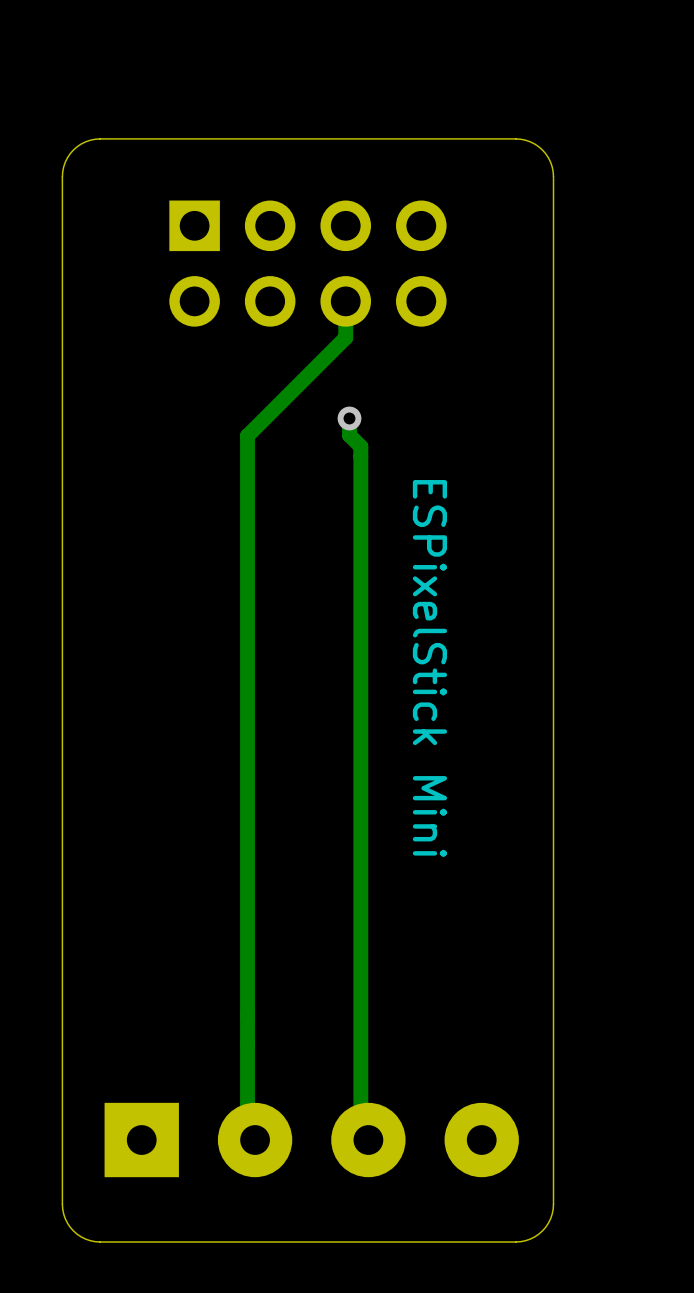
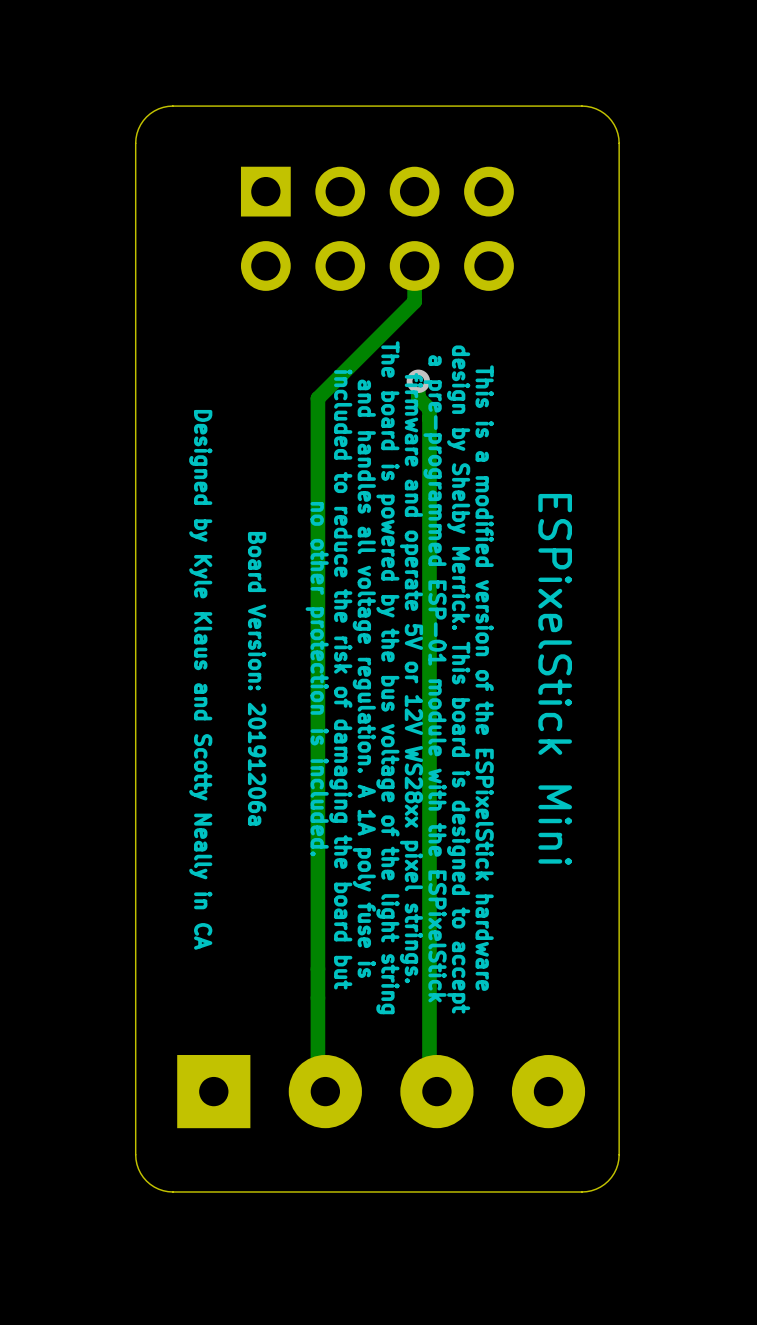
text position: ESPixelStick Mini (429, 668) -> ESPixelStick Mini (555, 679)
text: none -> The board is powered by the bus voltage of the light string (387, 677)
text: none -> firmware and operate 5V or 12V WS28xx pixel strings. (411, 678)
text: none -> This is a modified version of the ESPixelStick hardware (484, 678)
text: none -> Board Version: 20191206a (257, 678)
text: none -> and handles all voltage regulation. A 1A poly fuse is (364, 678)
text: none -> a pre-programmed ESP-01 module with the ESPixelStick (435, 678)
text: none -> Designed by Kyle Klaus and Scotty Neally in CA (200, 679)
text: none -> no other protection is included. (317, 679)
text: none -> included to reduce the risk of damaging the board but (340, 679)
text: none -> design by Shelby Merrick. This board is designed to accept (458, 679)

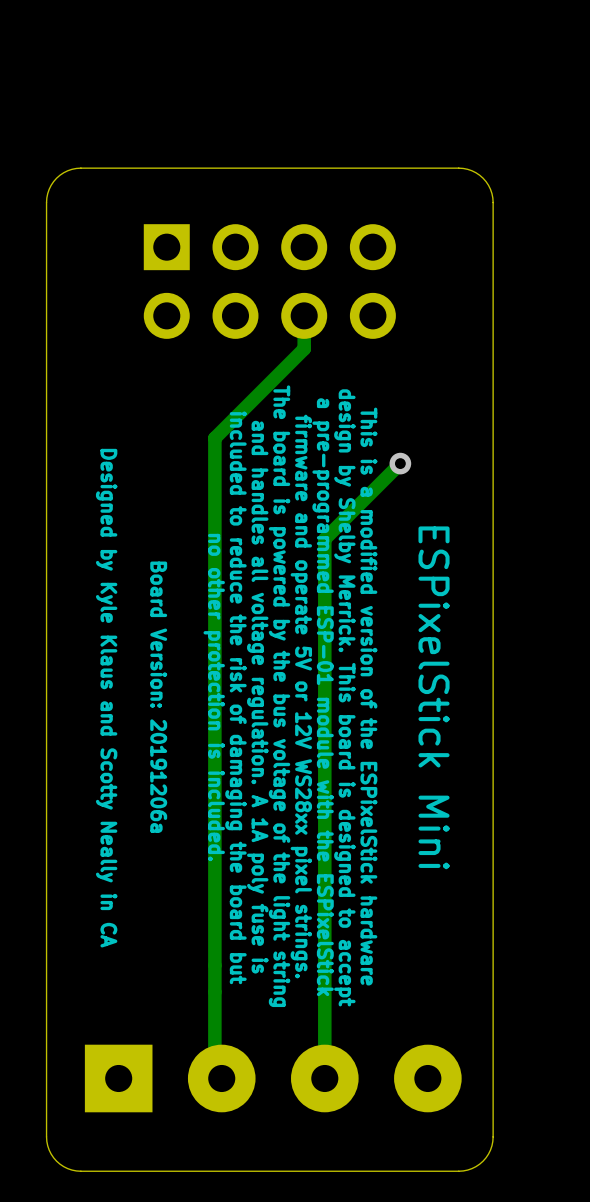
track: (418, 381) (418, 397) (429, 409) (429, 1091) -> none
via position: (418, 381) -> (400, 463)
track: none -> (400, 463) (324, 539) (324, 1078)

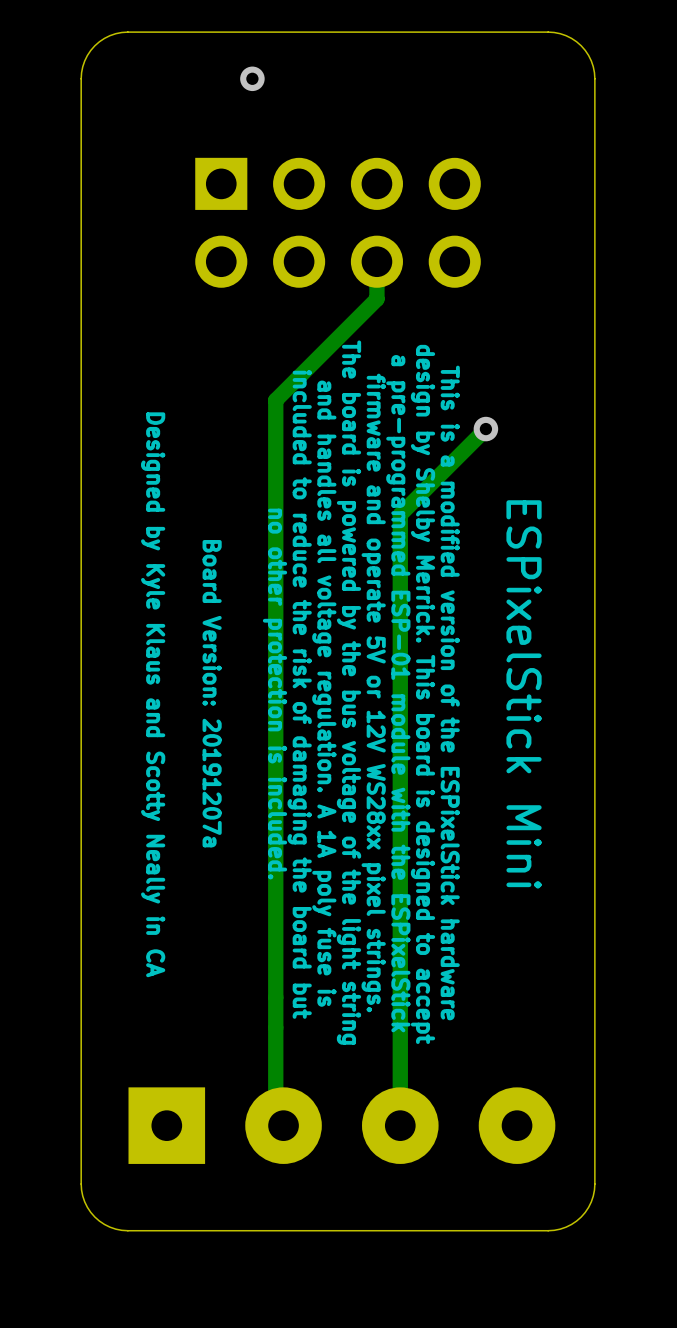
via: none -> (252, 78)
text: Board Version: 20191206a (158, 697) -> Board Version: 20191207a (212, 693)
board edge: (455, 1171) (471, 1168) (483, 1161) (490, 1150) (493, 1136) (493, 202) (490, 189) (483, 178) (471, 170) (458, 168) (80, 168) (63, 172) (56, 178) (49, 189) (46, 202) (46, 1136) (49, 1150) (56, 1161) (67, 1168) (84, 1171) -> (548, 1230) (566, 1227) (581, 1217) (591, 1201) (594, 1184) (594, 78) (591, 60) (581, 45) (566, 35) (548, 32) (127, 32) (115, 33) (104, 38) (94, 45) (84, 60) (81, 78) (81, 1184) (84, 1201) (94, 1217) (110, 1227) (127, 1230)

